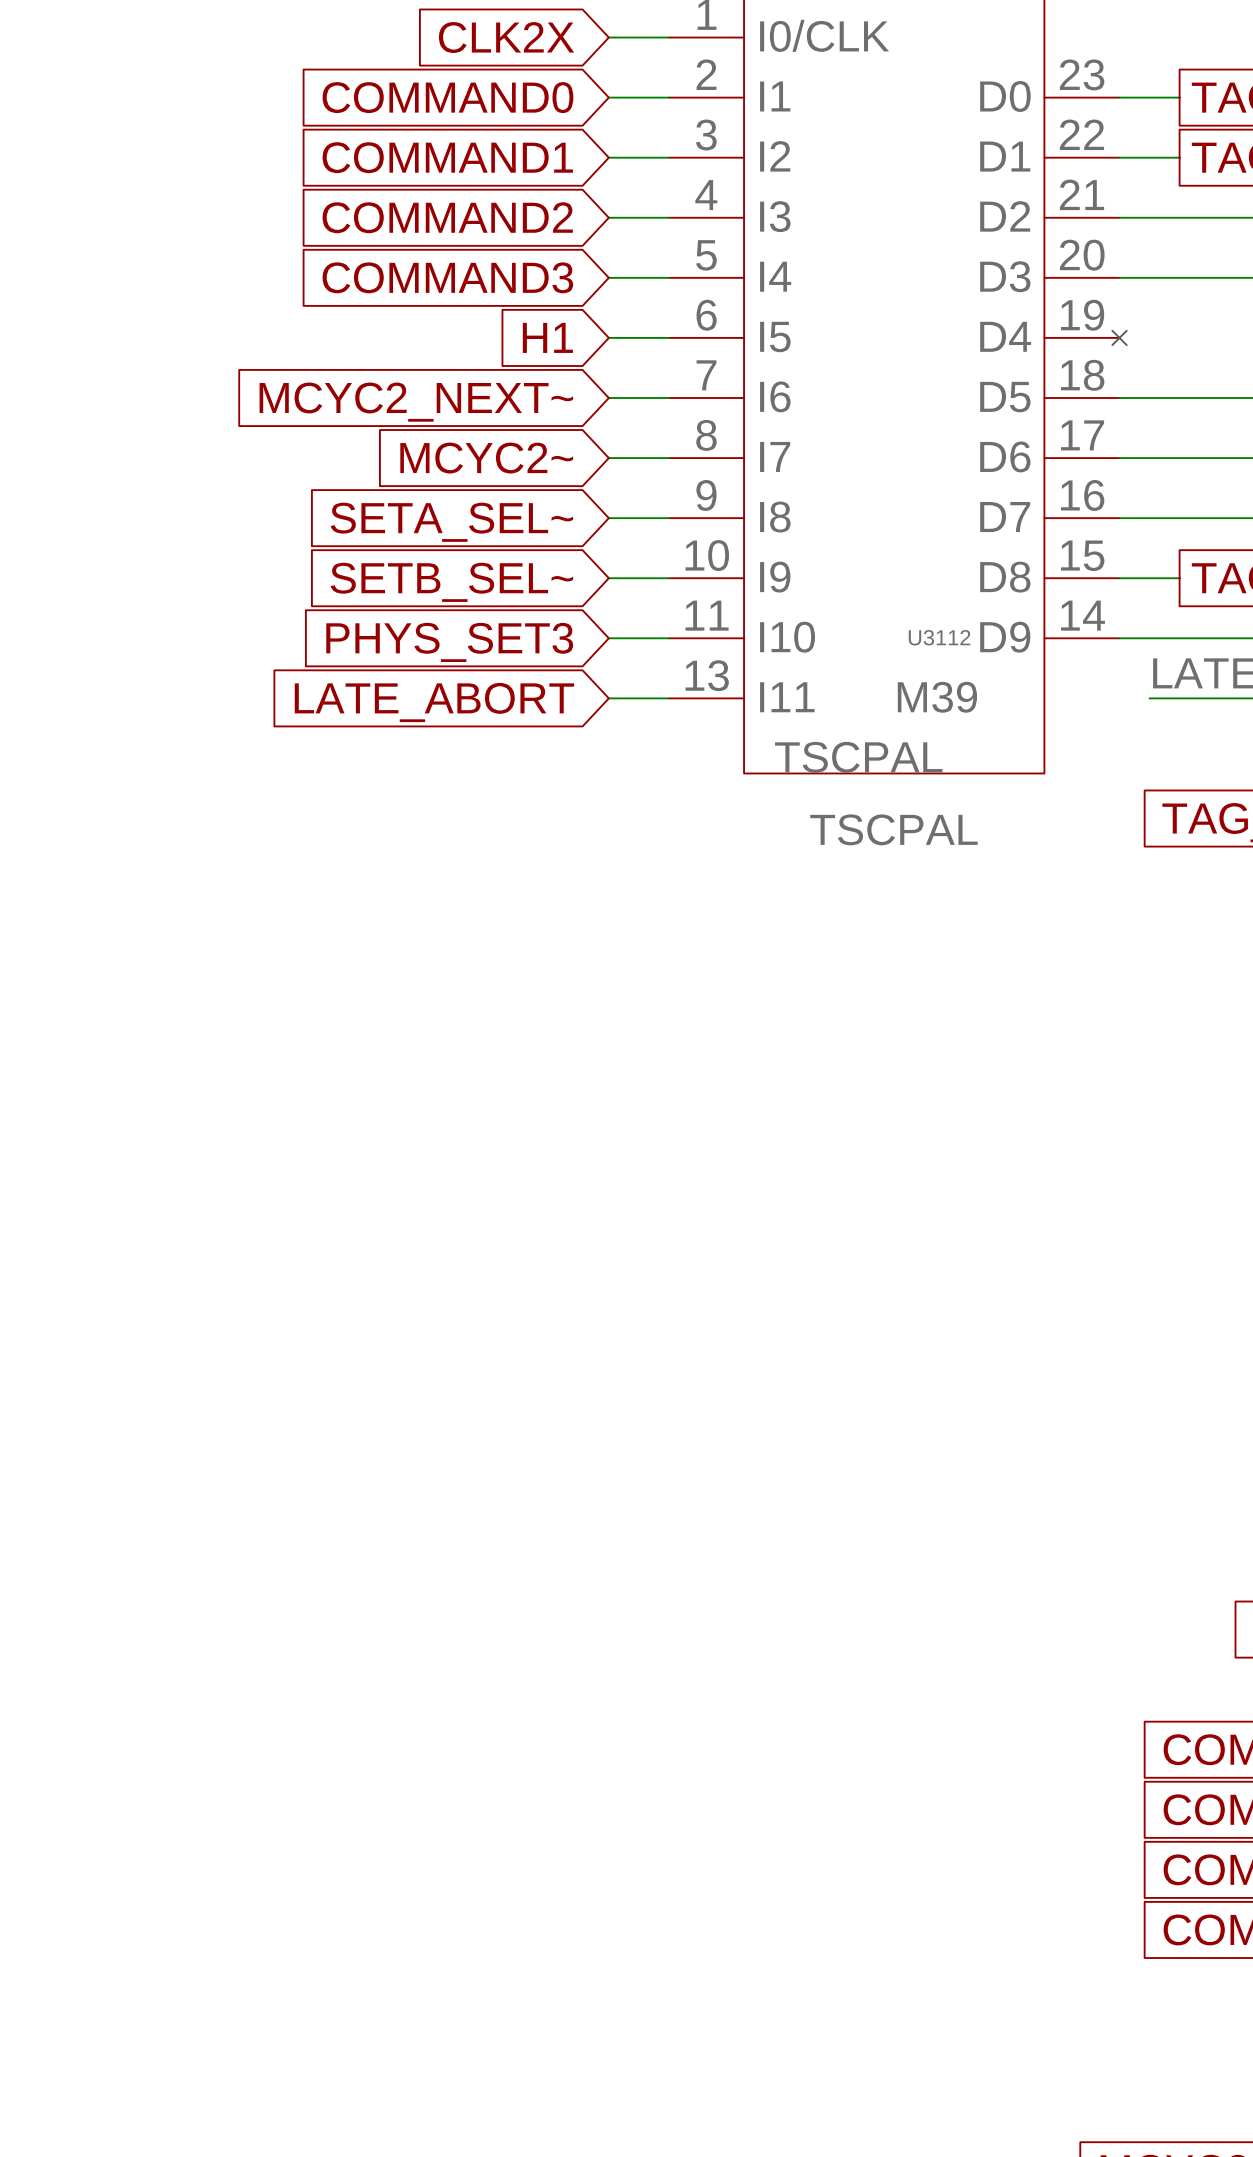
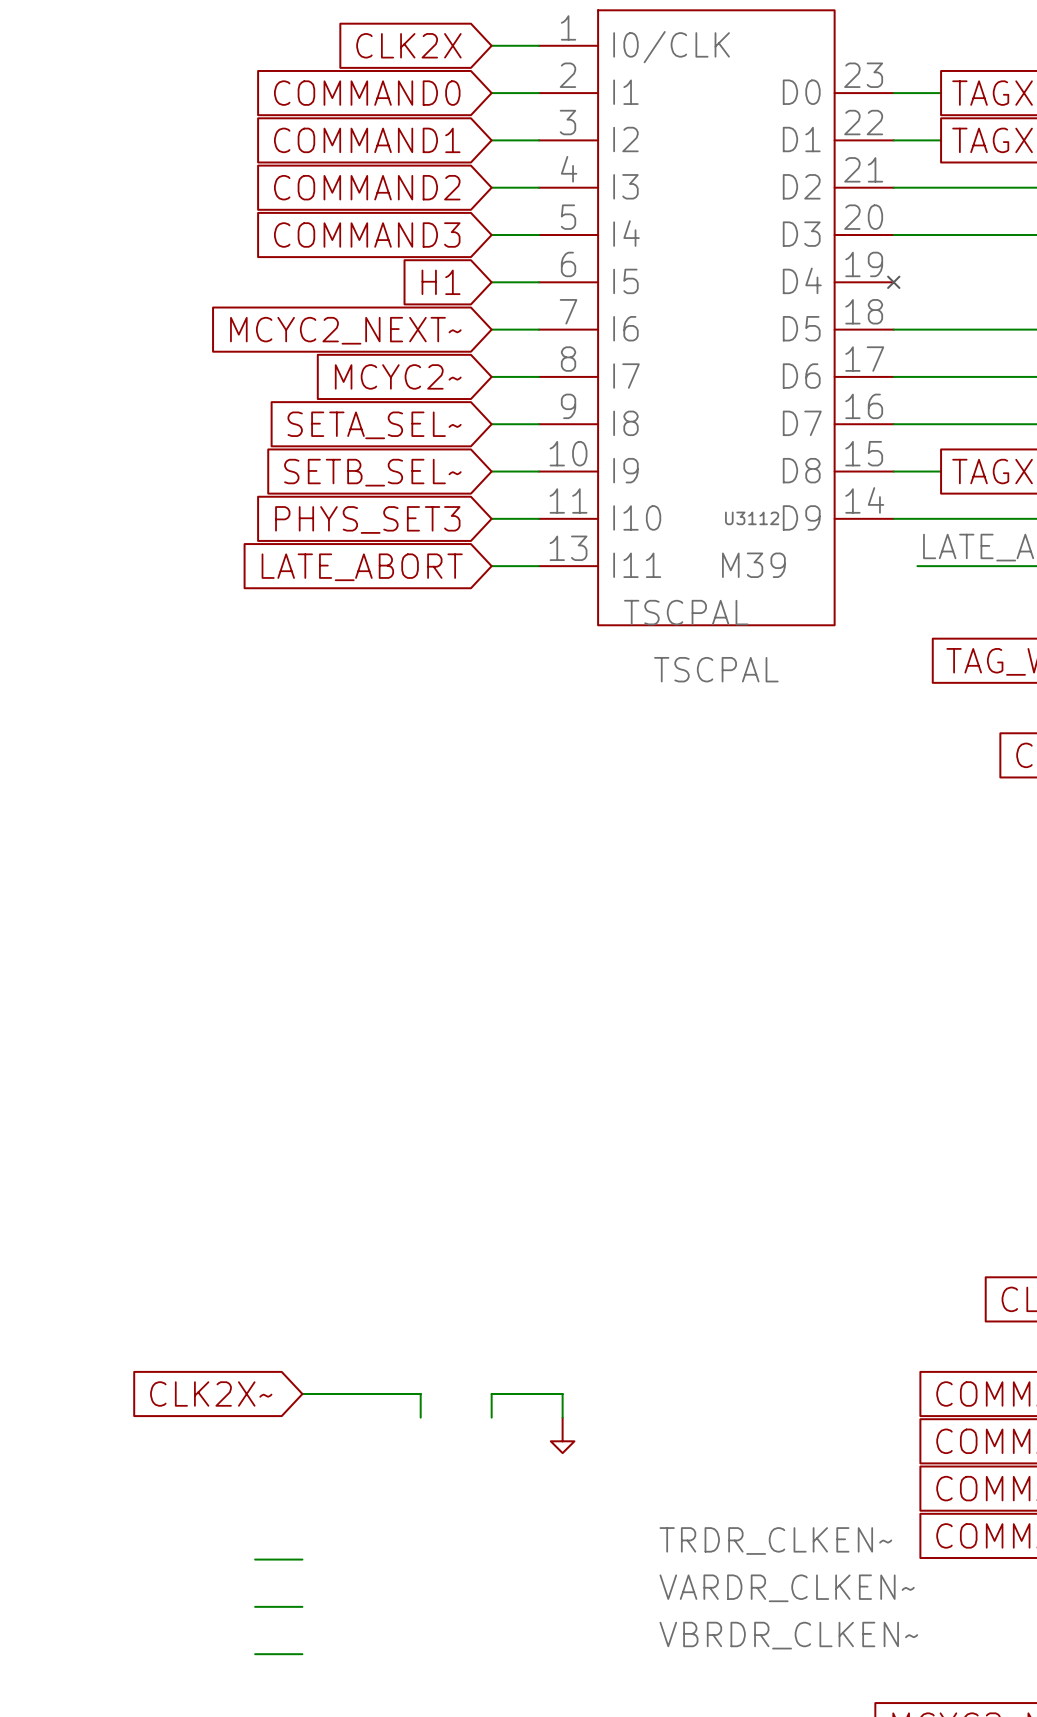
global label: none -> CLK2X~ (211, 1393)
wire: none -> (302, 1393) (420, 1393) (420, 1417)
wire: none -> (491, 1417) (491, 1393) (562, 1393) (562, 1417)
power symbol: none -> (562, 1435)
label: none -> TRDR_CLKEN~ (775, 1541)
wire: none -> (255, 1559) (302, 1559)
label: none -> VARDR_CLKEN~ (787, 1588)
wire: none -> (255, 1606) (302, 1606)
label: none -> VBRDR_CLKEN~ (788, 1635)
wire: none -> (255, 1654) (302, 1654)

